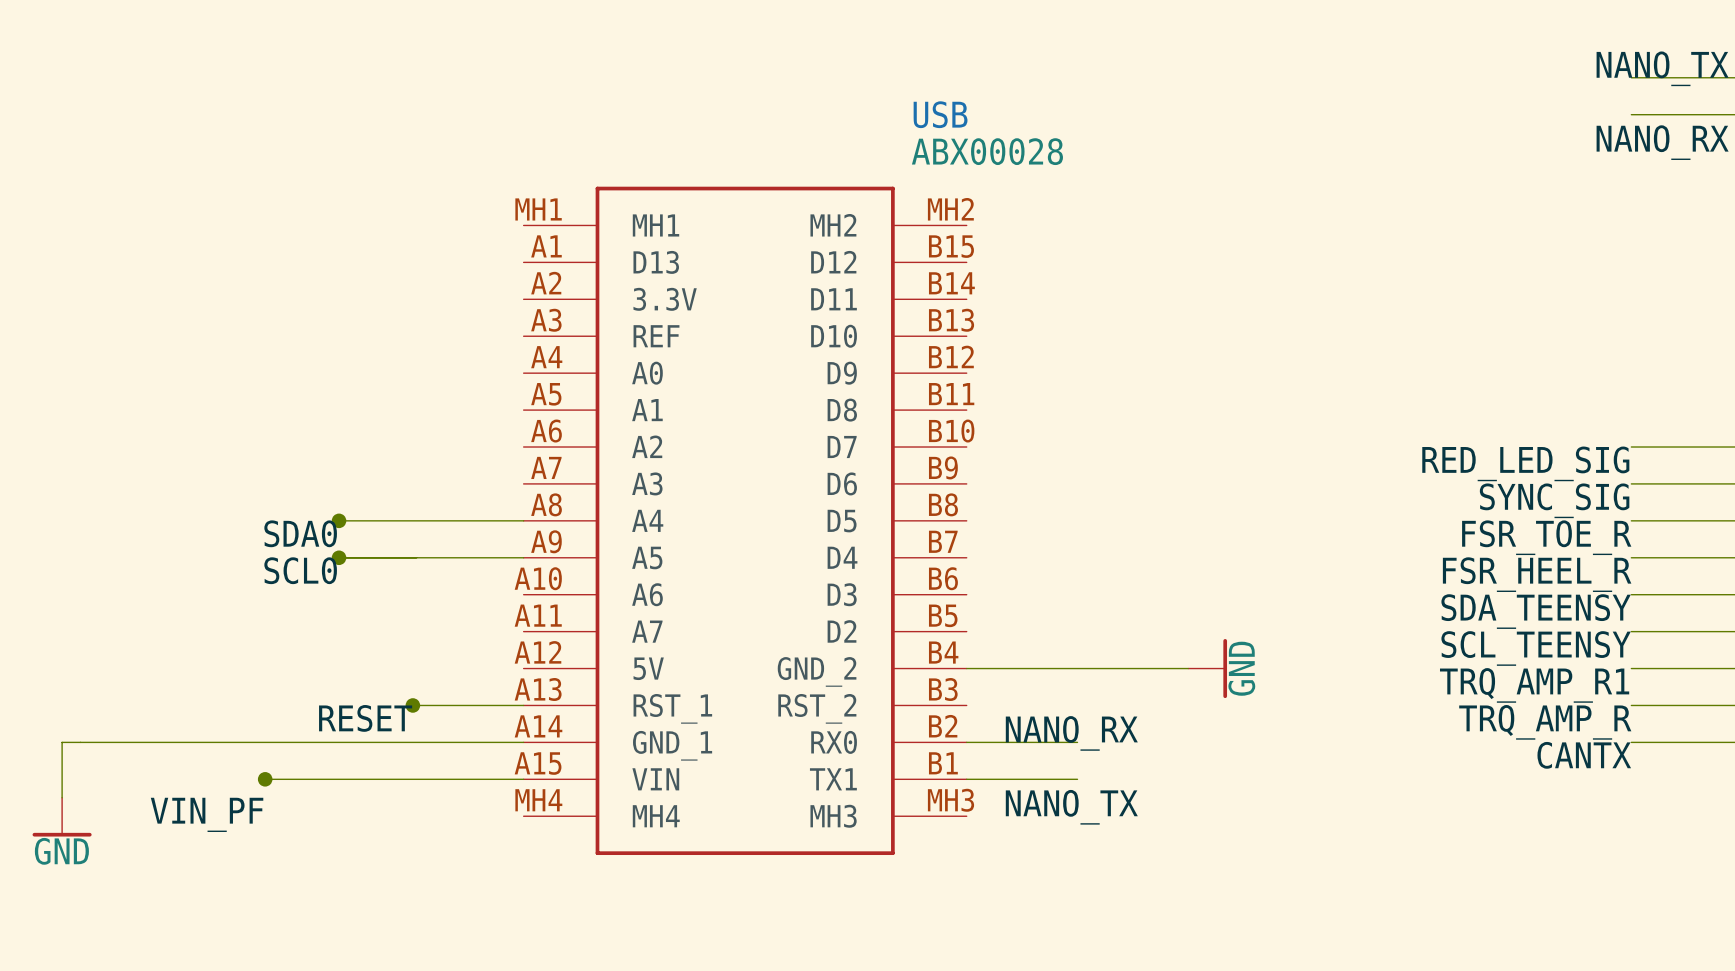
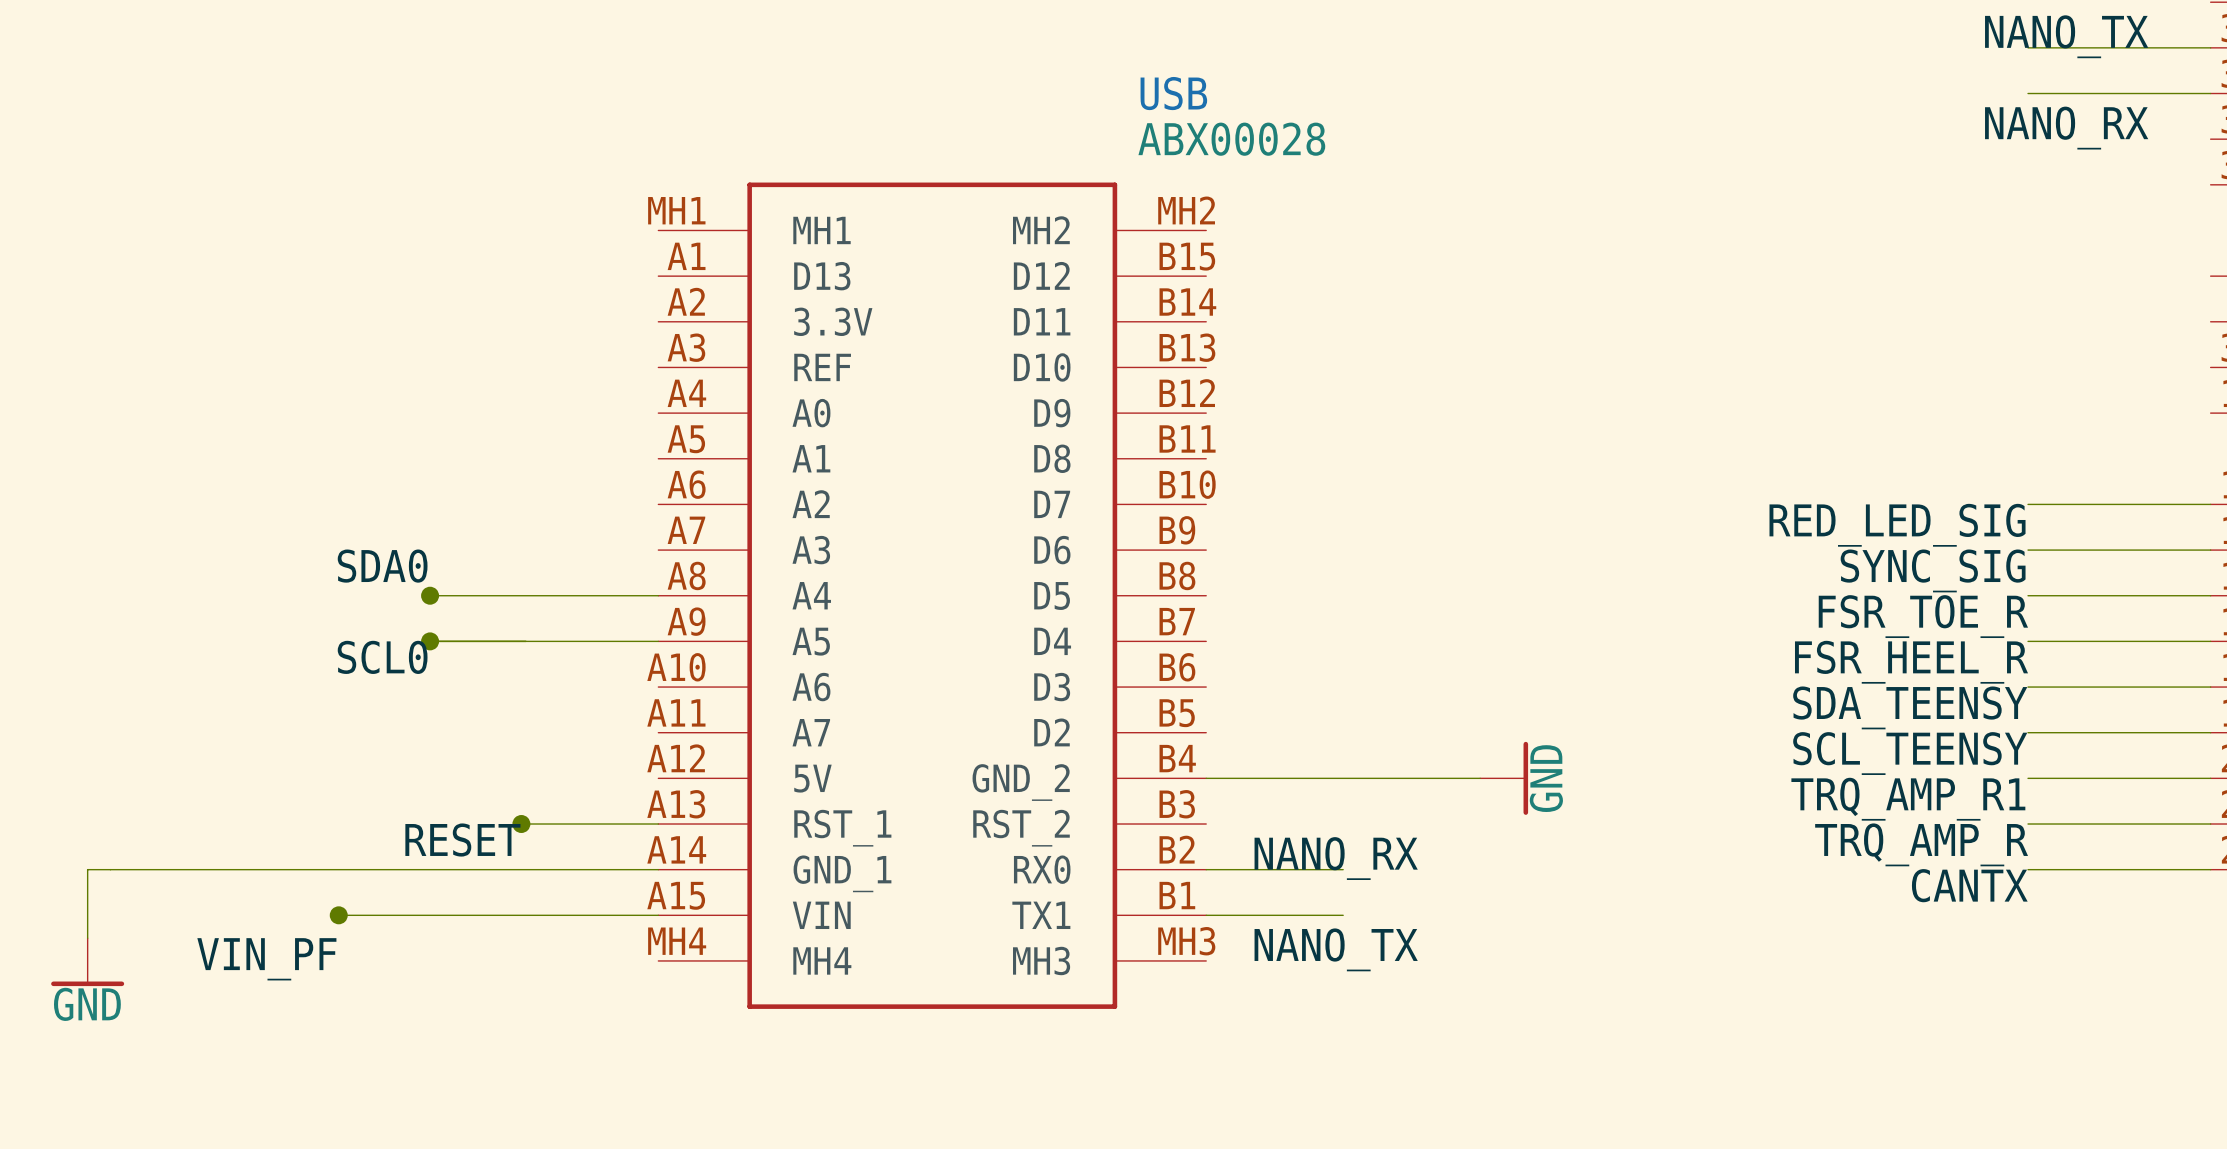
label position: SDA0 (300, 533) -> SDA0 (382, 566)

